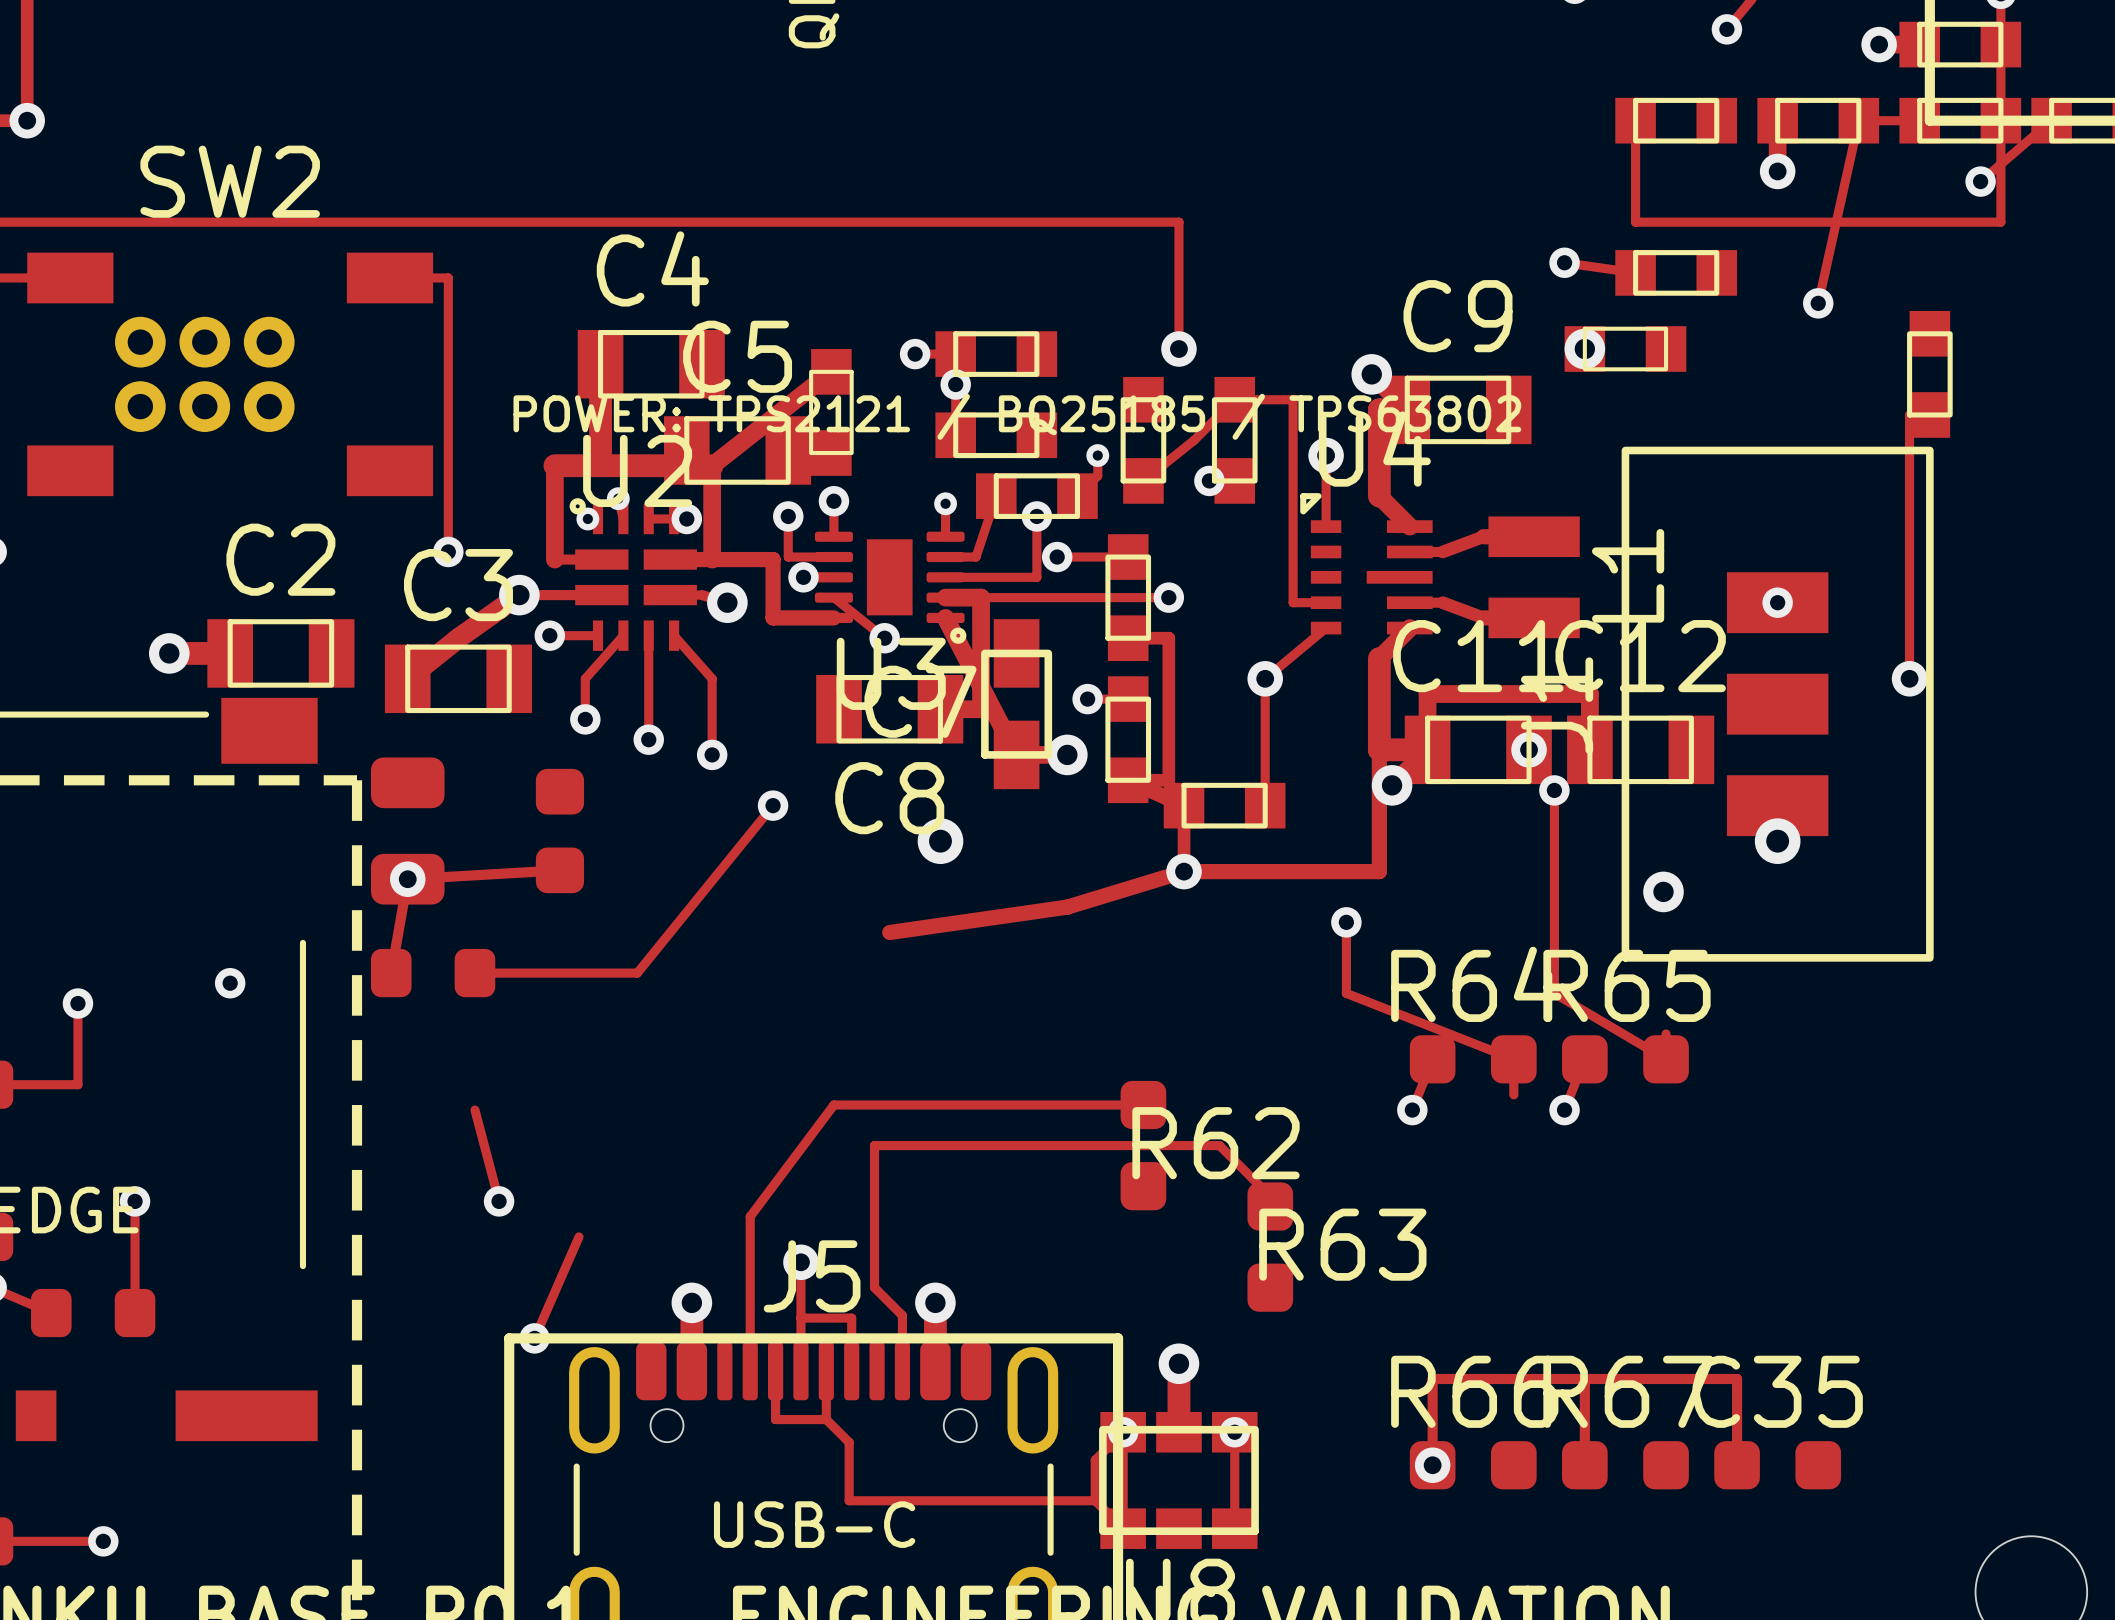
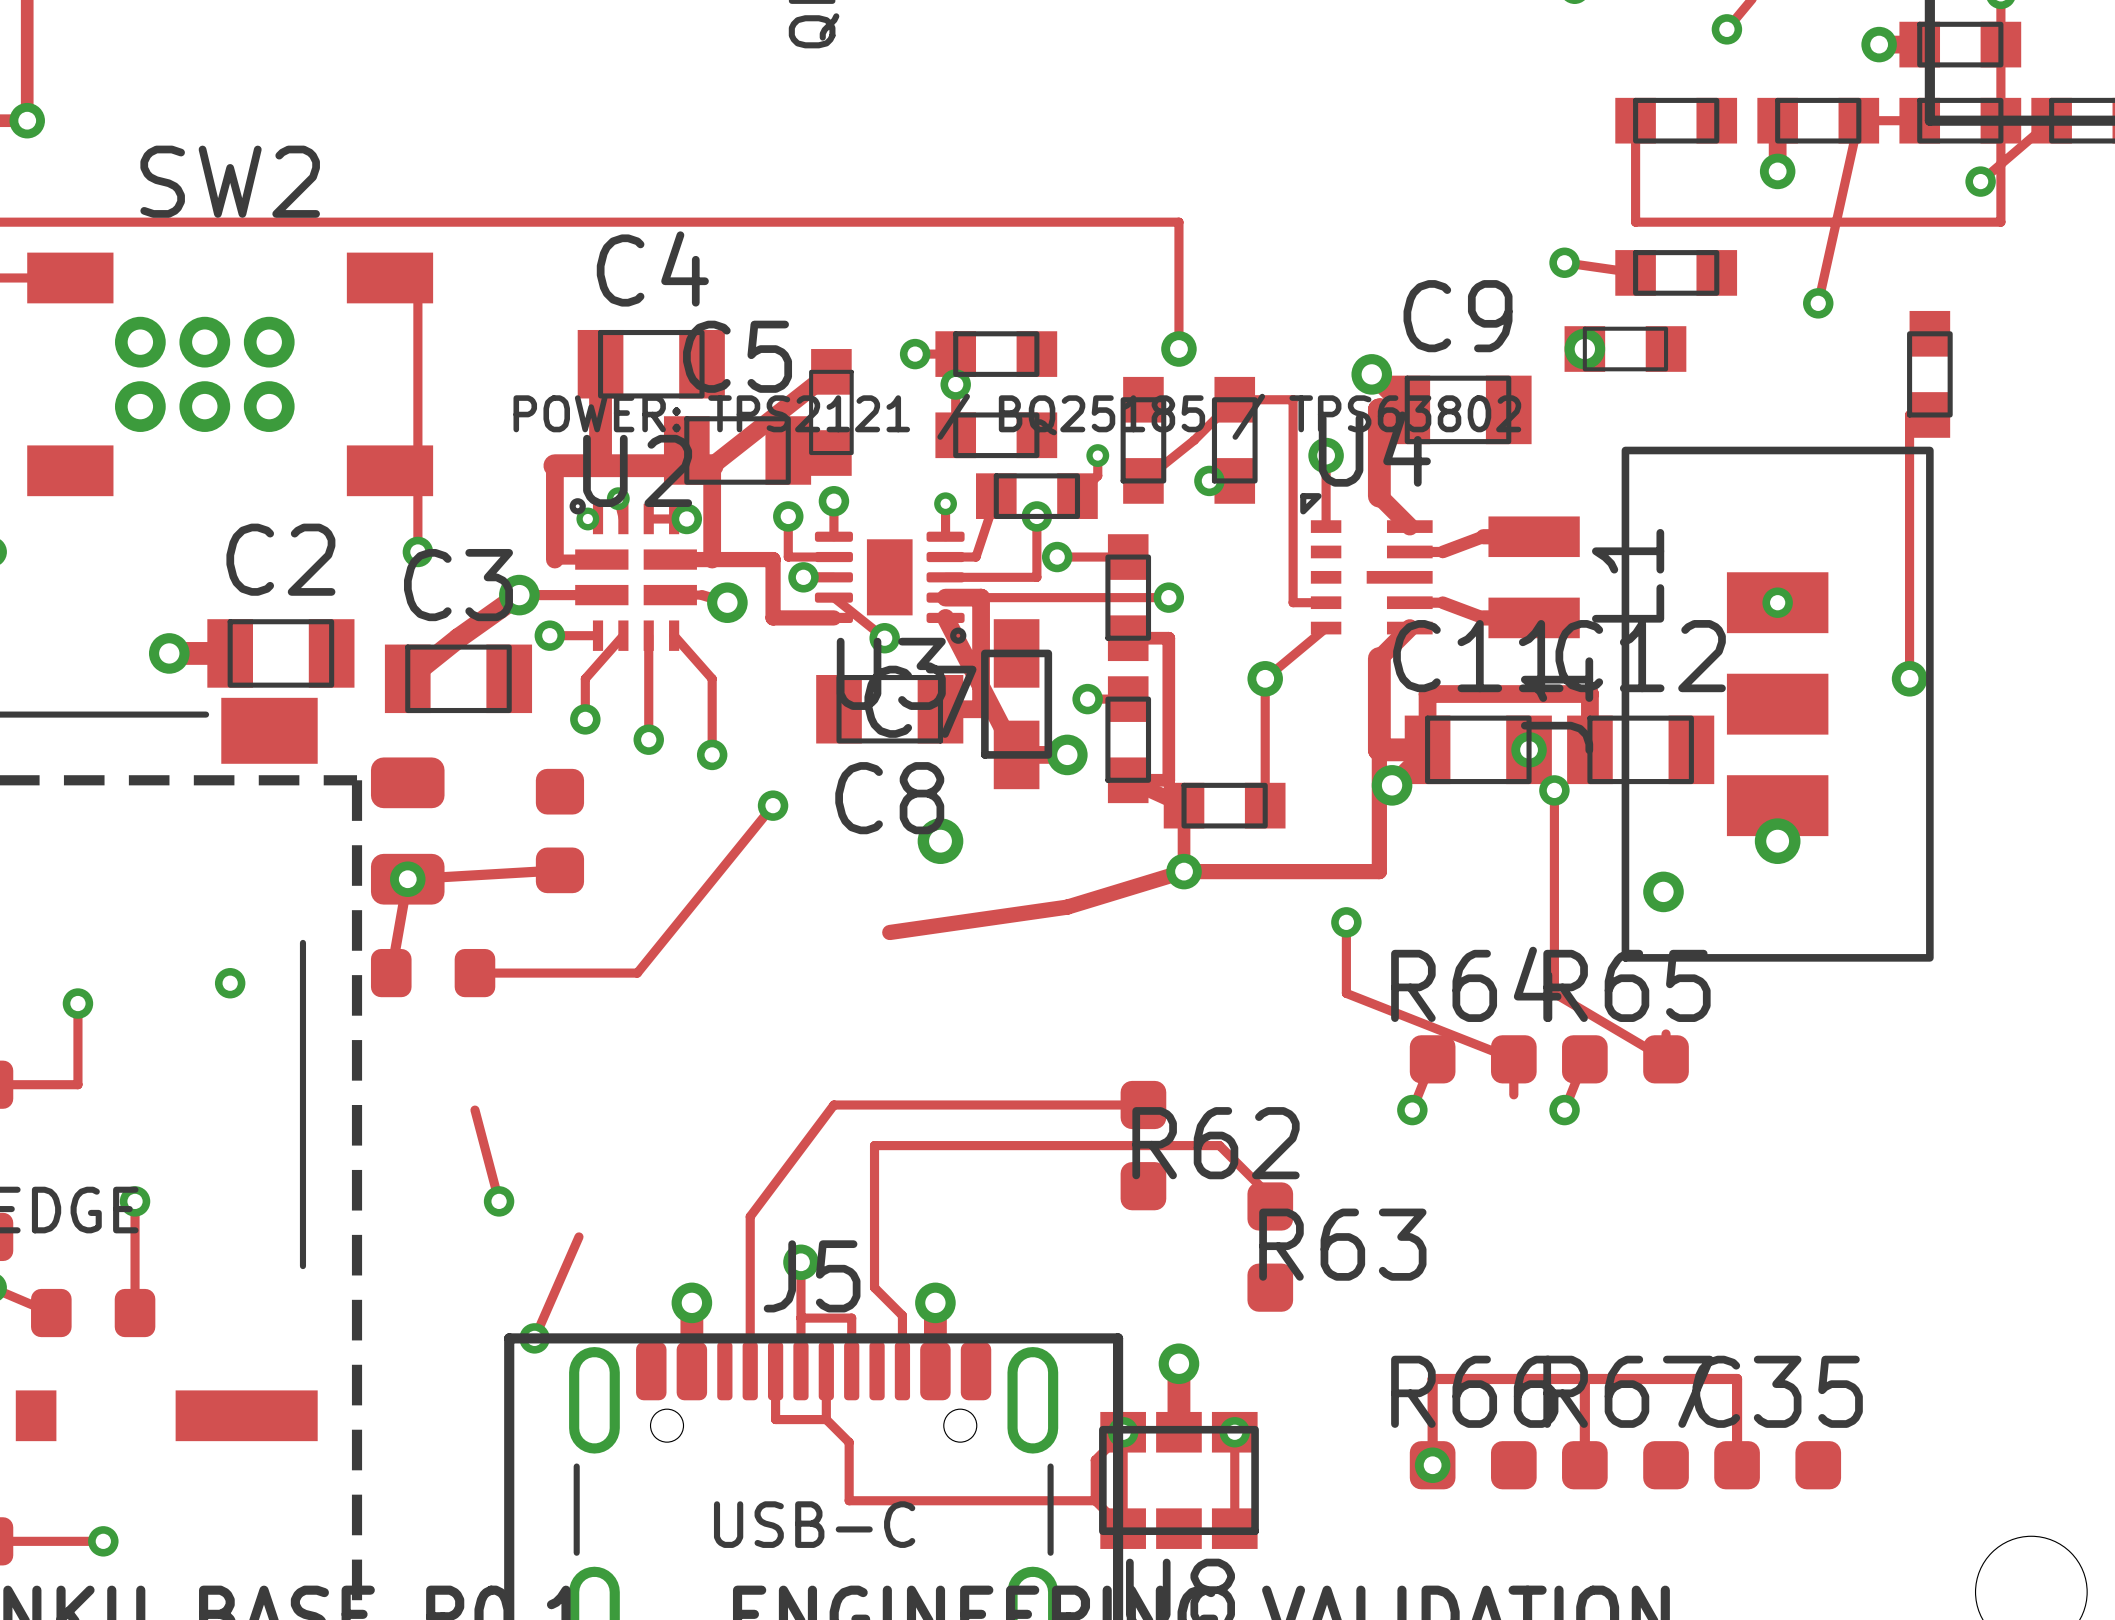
track: (417, 277) (448, 277) (448, 551) -> (417, 277) (417, 551)
via position: (448, 551) -> (417, 551)

